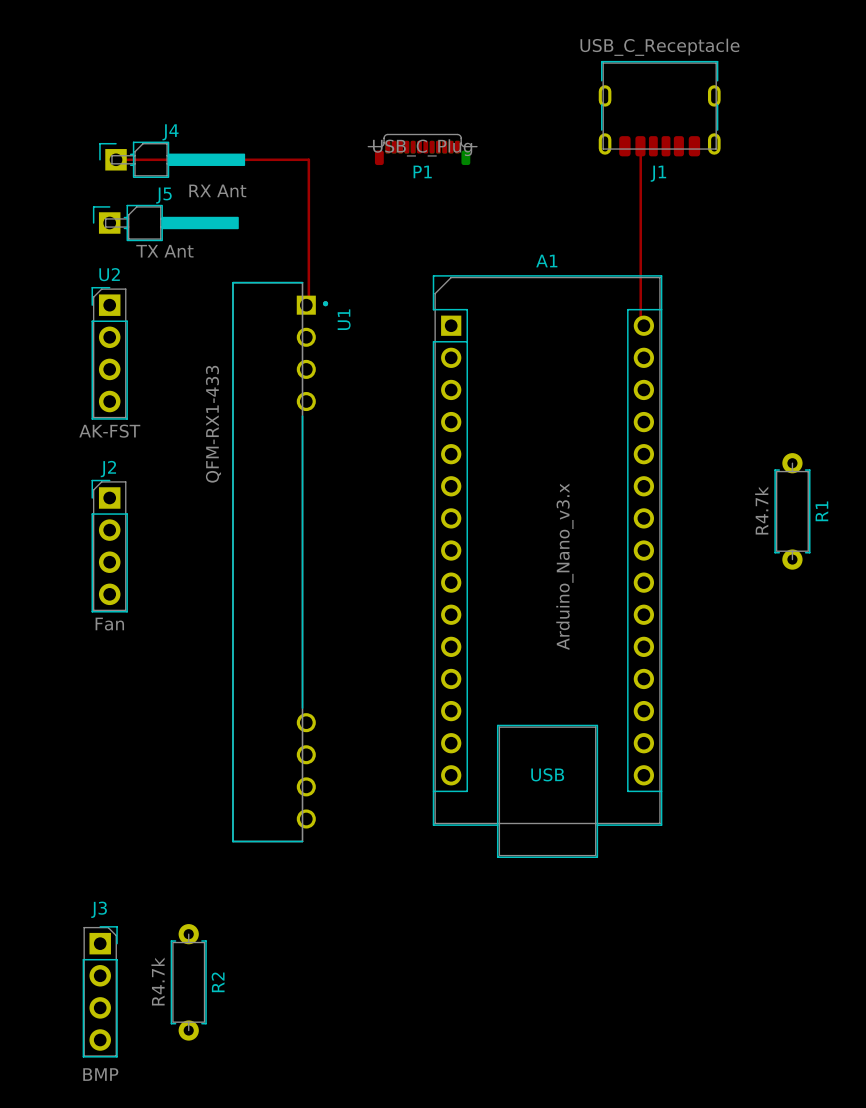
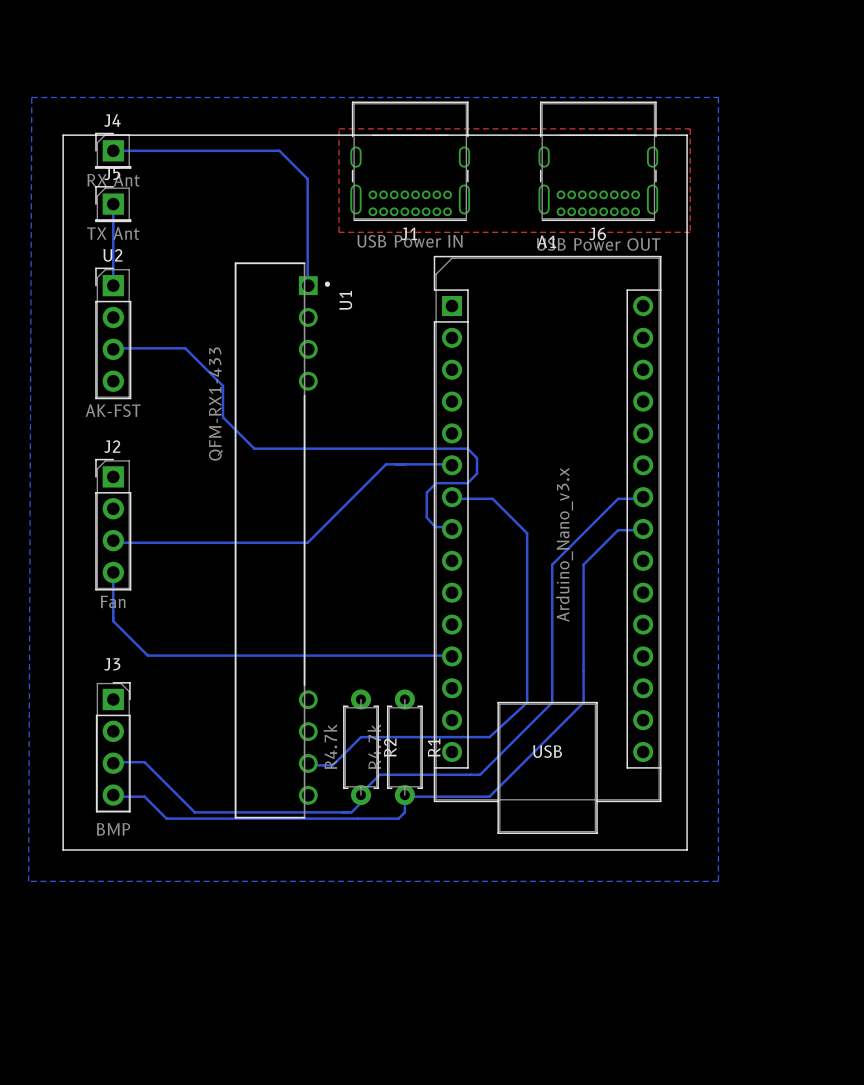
J1 value: USB_C_Receptacle (659, 47) -> USB Power IN (409, 241)
J1 footprint: [598, 60, 721, 157] -> [350, 101, 471, 222]
bottom zone outline: none -> (31, 97) (718, 97) (718, 881) (28, 881) (31, 97)
J4 footprint: [99, 141, 246, 178] -> [95, 132, 132, 169]
top zone outline: none -> (339, 128) (690, 128) (690, 232) (339, 232) (339, 128)
P1: USB_C_Plug (422, 149) -> none
board edge: none -> (63, 135) (687, 135) (687, 850) (63, 850) (63, 135)
top track: (640, 153) (640, 317) -> none
top track: (116, 159) (308, 159) (308, 302) -> none
bottom track: none -> (122, 150) (279, 150) (307, 179) (307, 276)
J6: none -> USB Power OUT (598, 161)
J4 value position: RX Ant (217, 190) -> RX Ant (113, 180)
J5 footprint: [92, 204, 239, 242] -> [95, 186, 132, 223]
bottom track: none -> (113, 210) (113, 276)
bottom track: none -> (122, 348) (185, 348) (223, 385) (223, 417) (254, 448) (467, 448) (476, 458) (476, 473) (467, 483) (436, 483) (426, 492) (426, 517) (435, 527)
bottom track: none -> (445, 464) (386, 464) (307, 542) (119, 542)
R1 position: (792, 511) -> (404, 747)
bottom track: none -> (461, 498) (492, 498) (527, 533) (527, 702) (489, 737) (360, 737) (332, 765) (317, 765)
bottom track: none -> (633, 498) (618, 498) (552, 564) (552, 702) (480, 774) (379, 774) (367, 787)
bottom track: none -> (436, 527) (442, 527)
bottom track: none -> (633, 530) (618, 530) (583, 564) (583, 702) (489, 796) (414, 796)
bottom track: none -> (113, 580) (113, 621) (147, 655) (445, 655)
bottom track: none -> (119, 762) (144, 762) (194, 812) (351, 812) (360, 802)
bottom track: none -> (122, 796) (144, 796) (166, 818) (398, 818) (404, 812) (404, 806)
R2 position: (188, 982) -> (360, 747)
J3 position: (100, 991) -> (113, 747)

